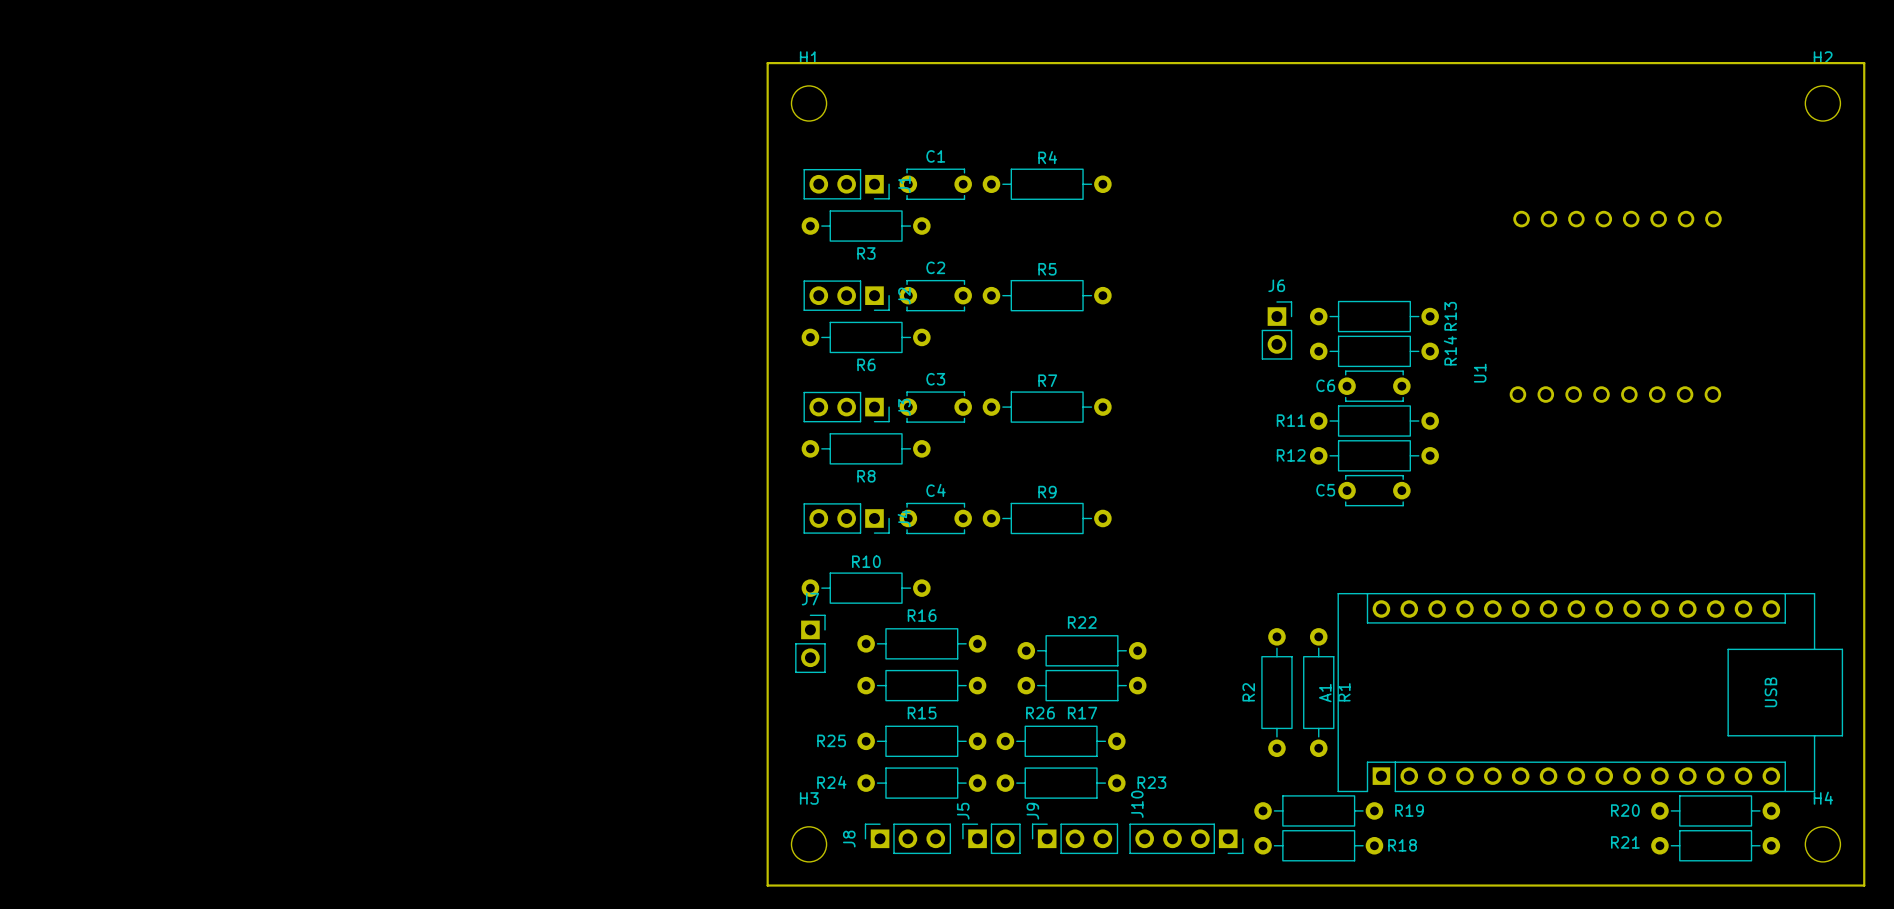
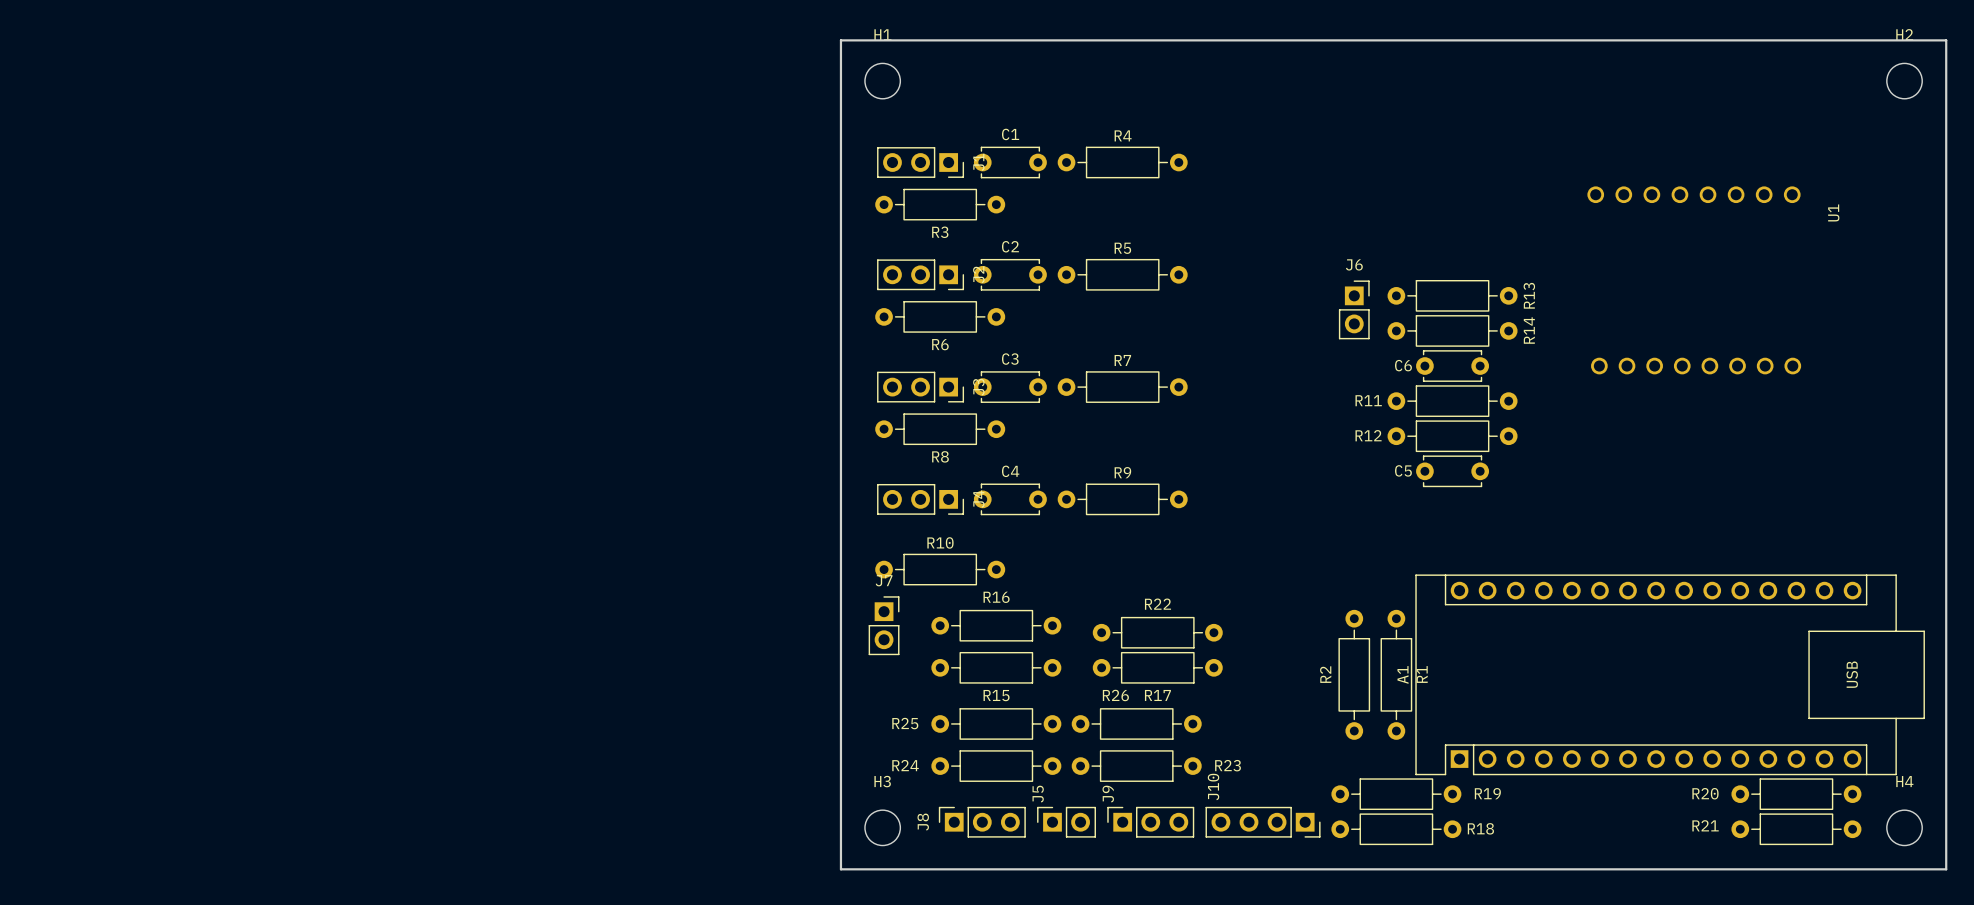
U1 footprint: [1509, 210, 1722, 403] -> [1587, 186, 1802, 375]
U1 name position: U1 (1480, 373) -> U1 (1833, 212)

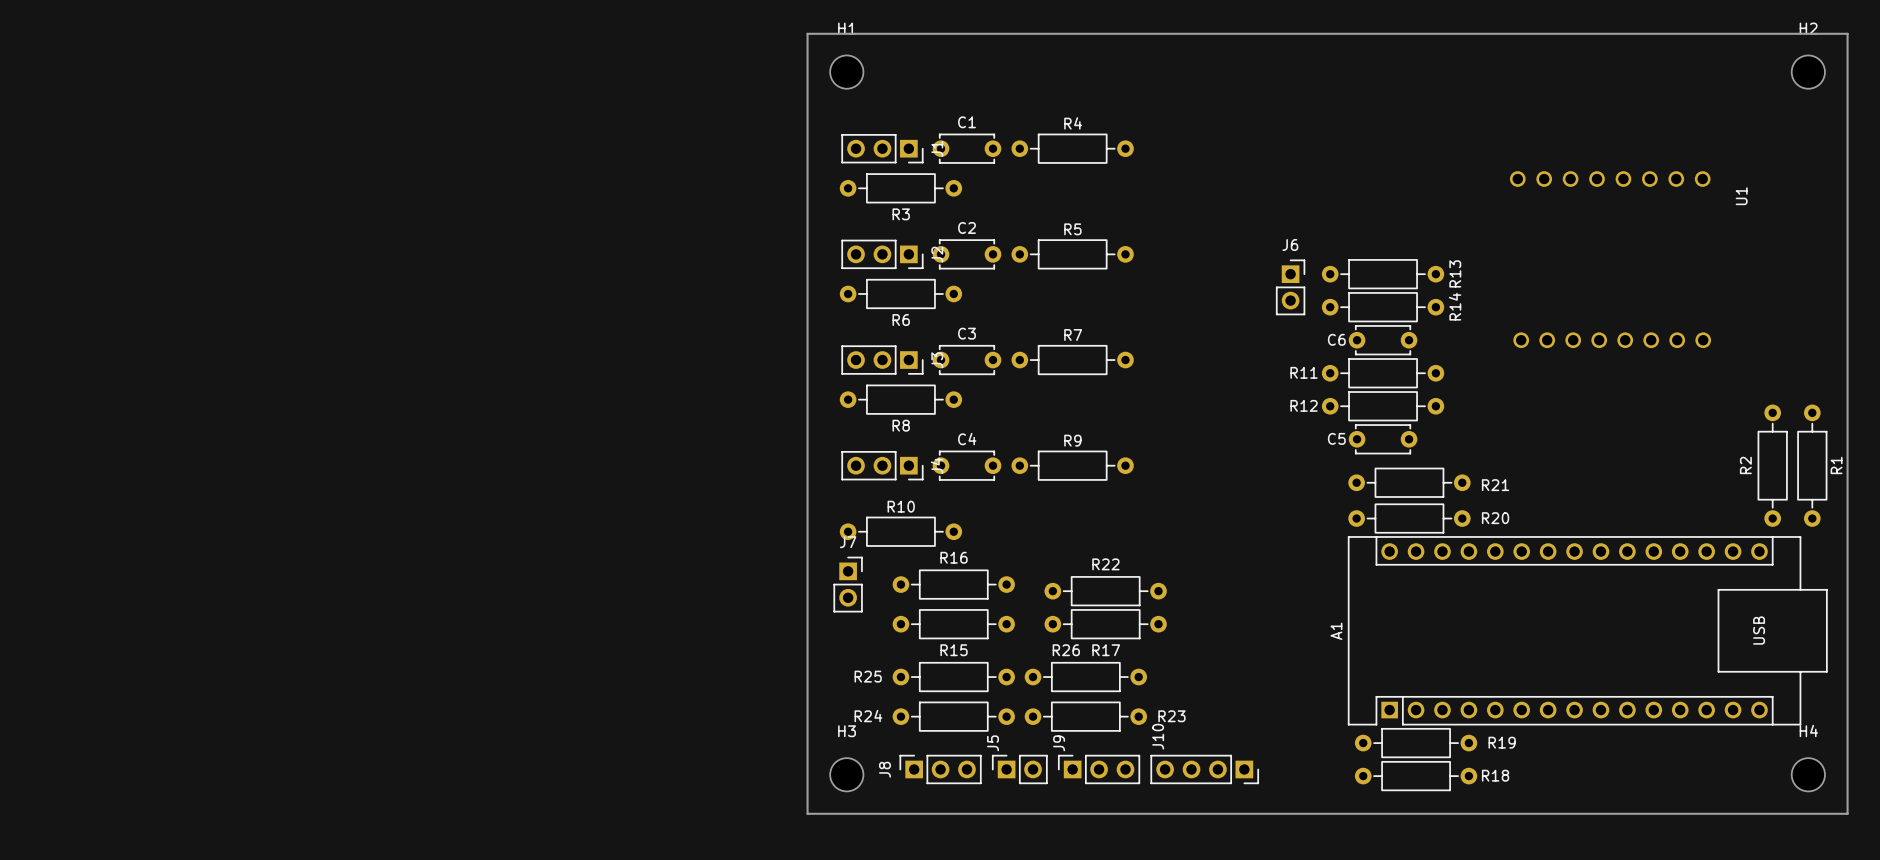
R2 position: (1354, 674) -> (1772, 465)
R1 position: (1396, 674) -> (1812, 465)
R20 name position: R20 (1705, 793) -> R20 (1495, 518)
R19 position: (1396, 794) -> (1416, 743)
R20 position: (1796, 794) -> (1409, 518)
R21 name position: R21 (1705, 825) -> R21 (1495, 485)
R18 position: (1396, 829) -> (1416, 776)
R21 position: (1796, 829) -> (1409, 482)

